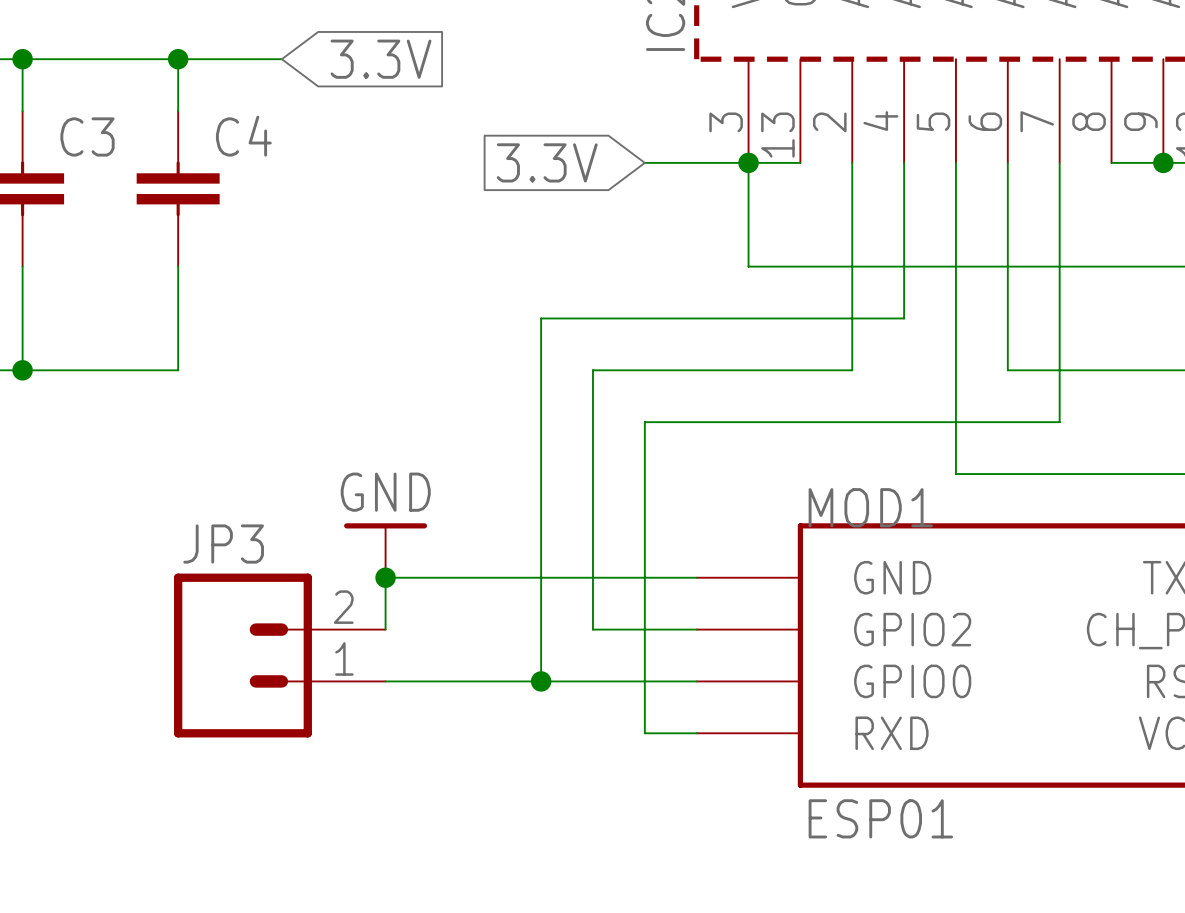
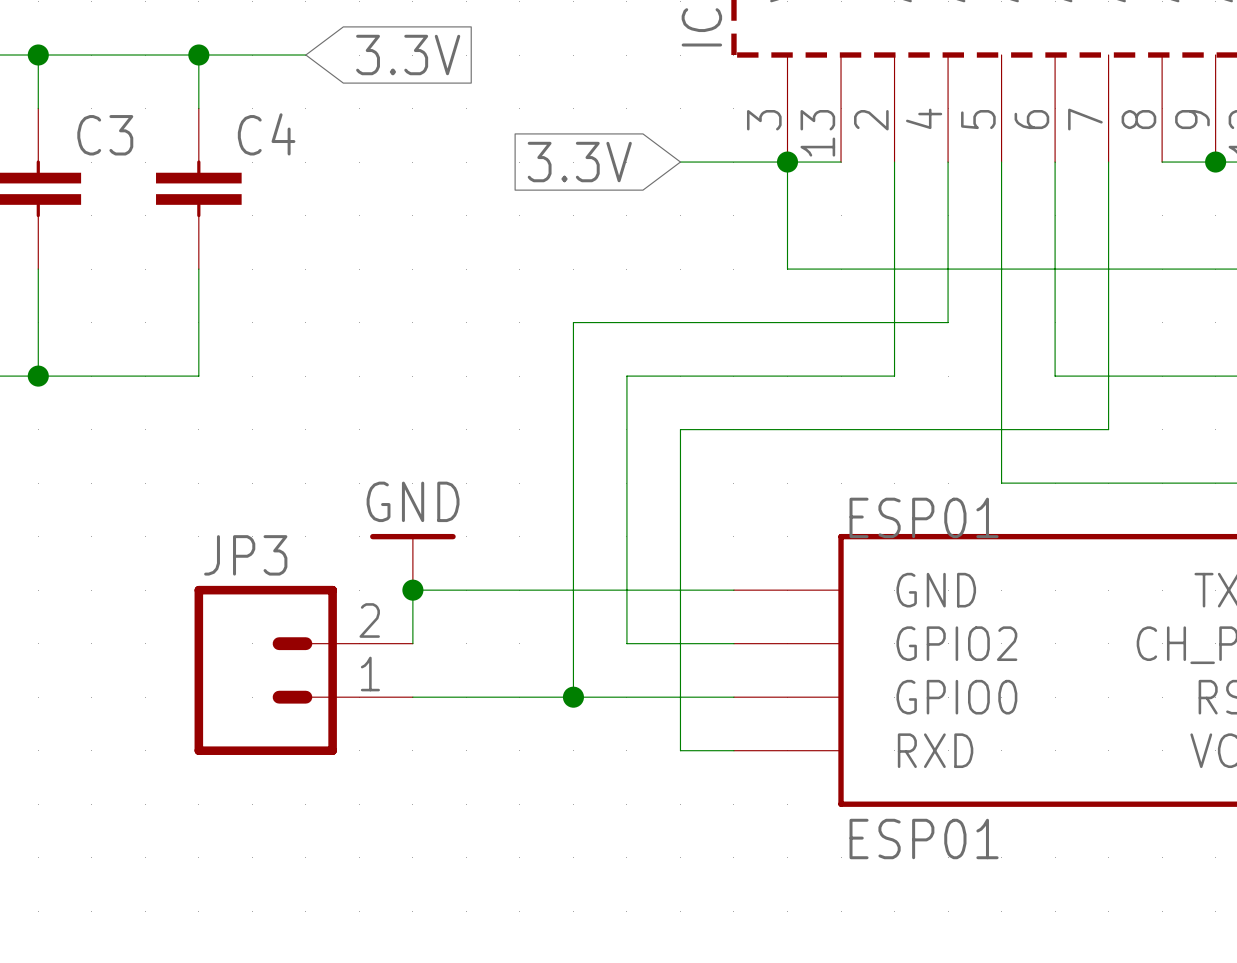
MOD1 name: MOD1 (870, 507) -> ESP01 (924, 517)

